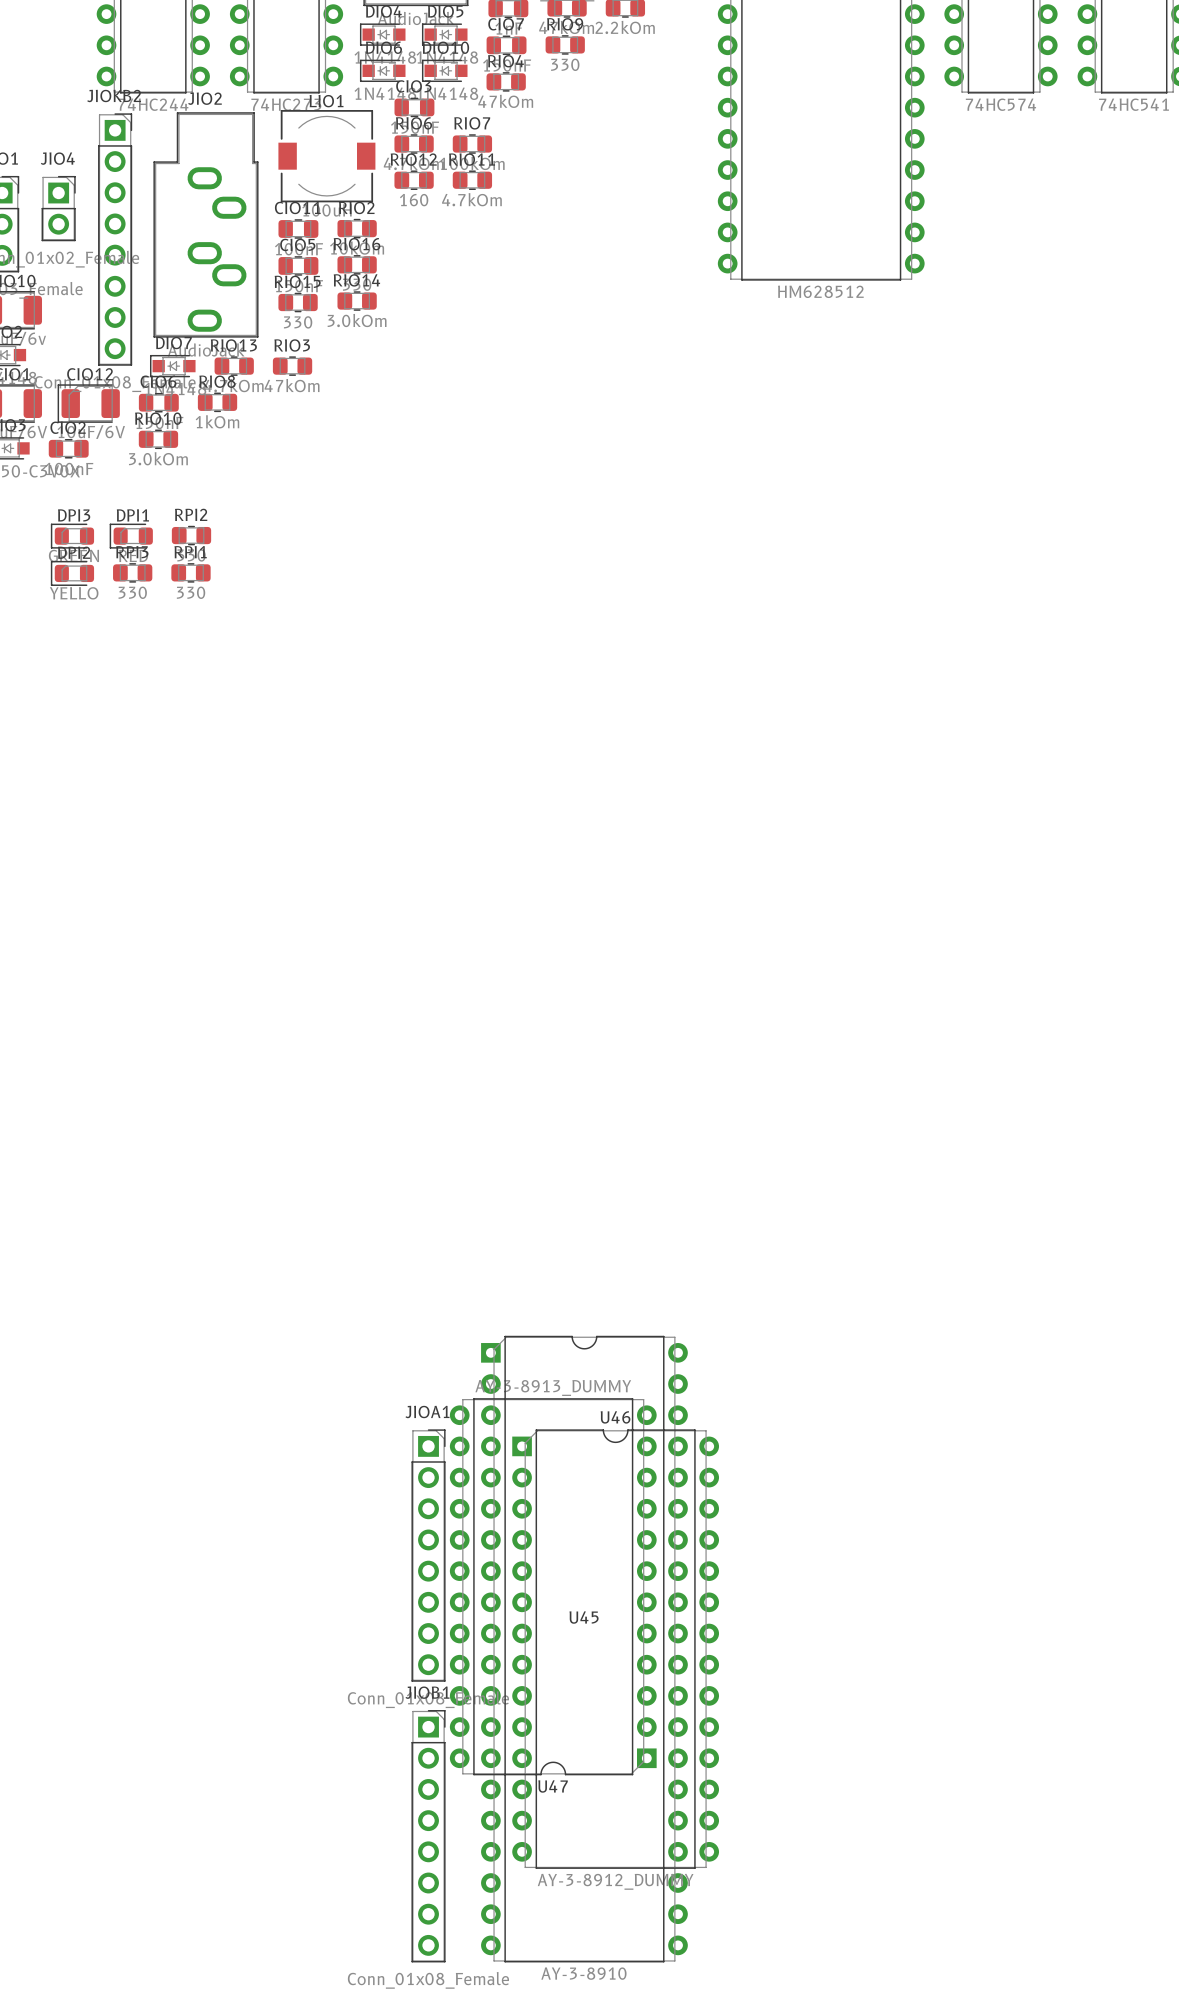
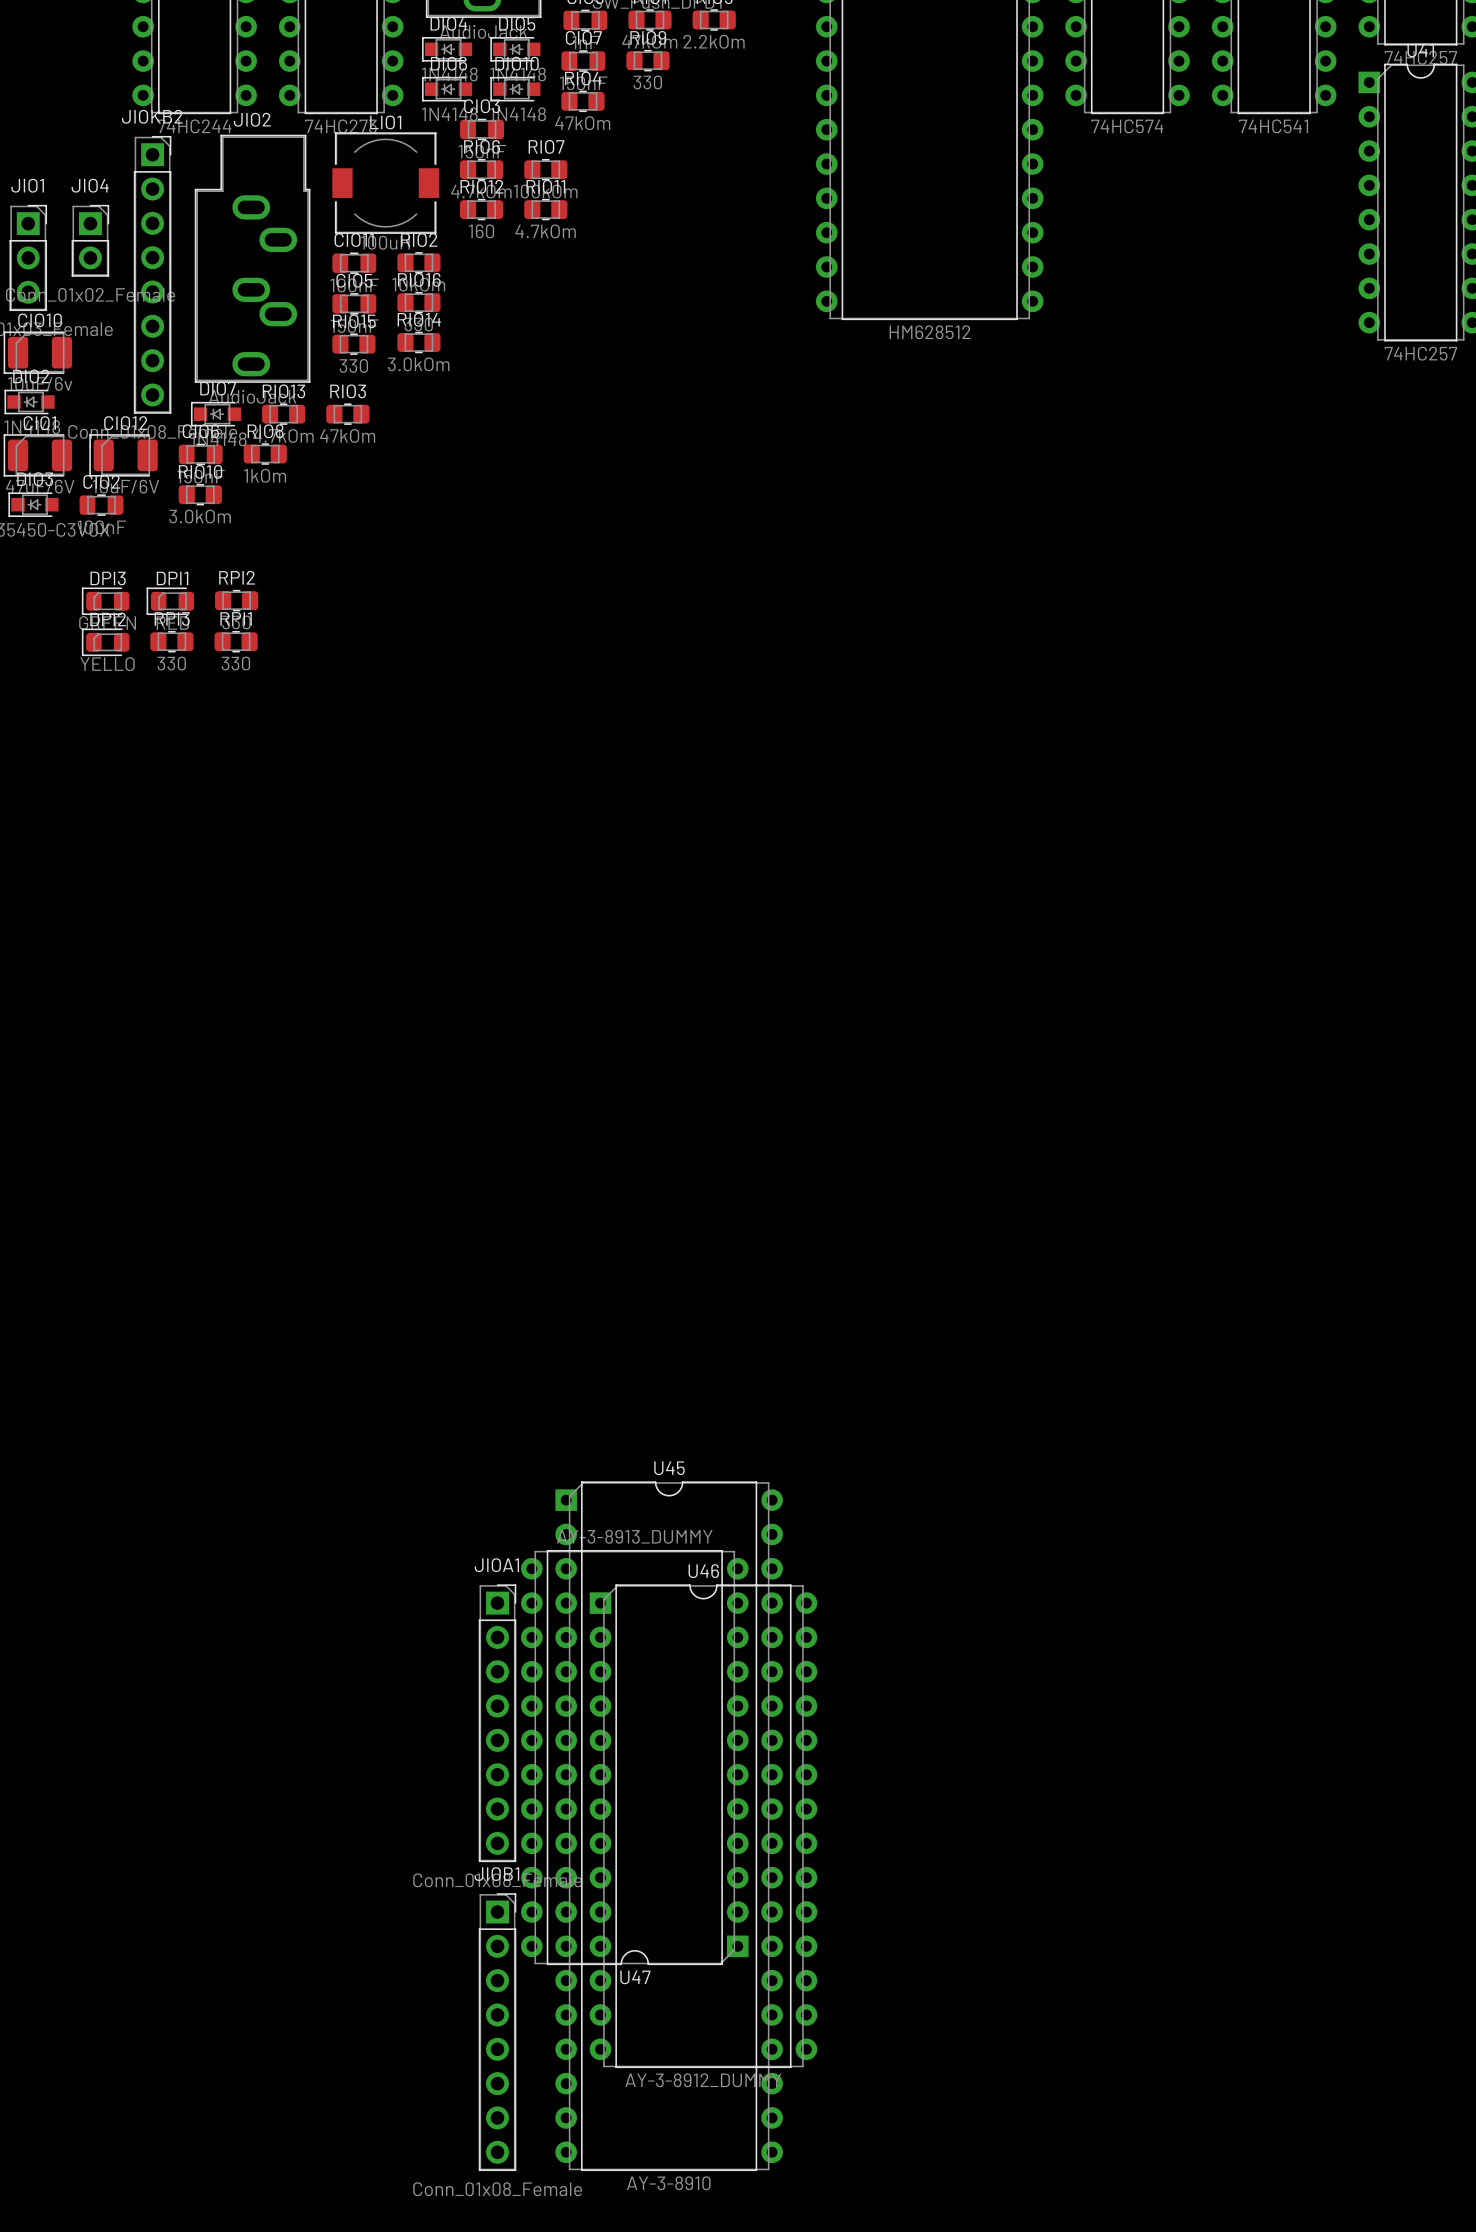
U45 name position: U45 (584, 1617) -> U45 (669, 1468)

